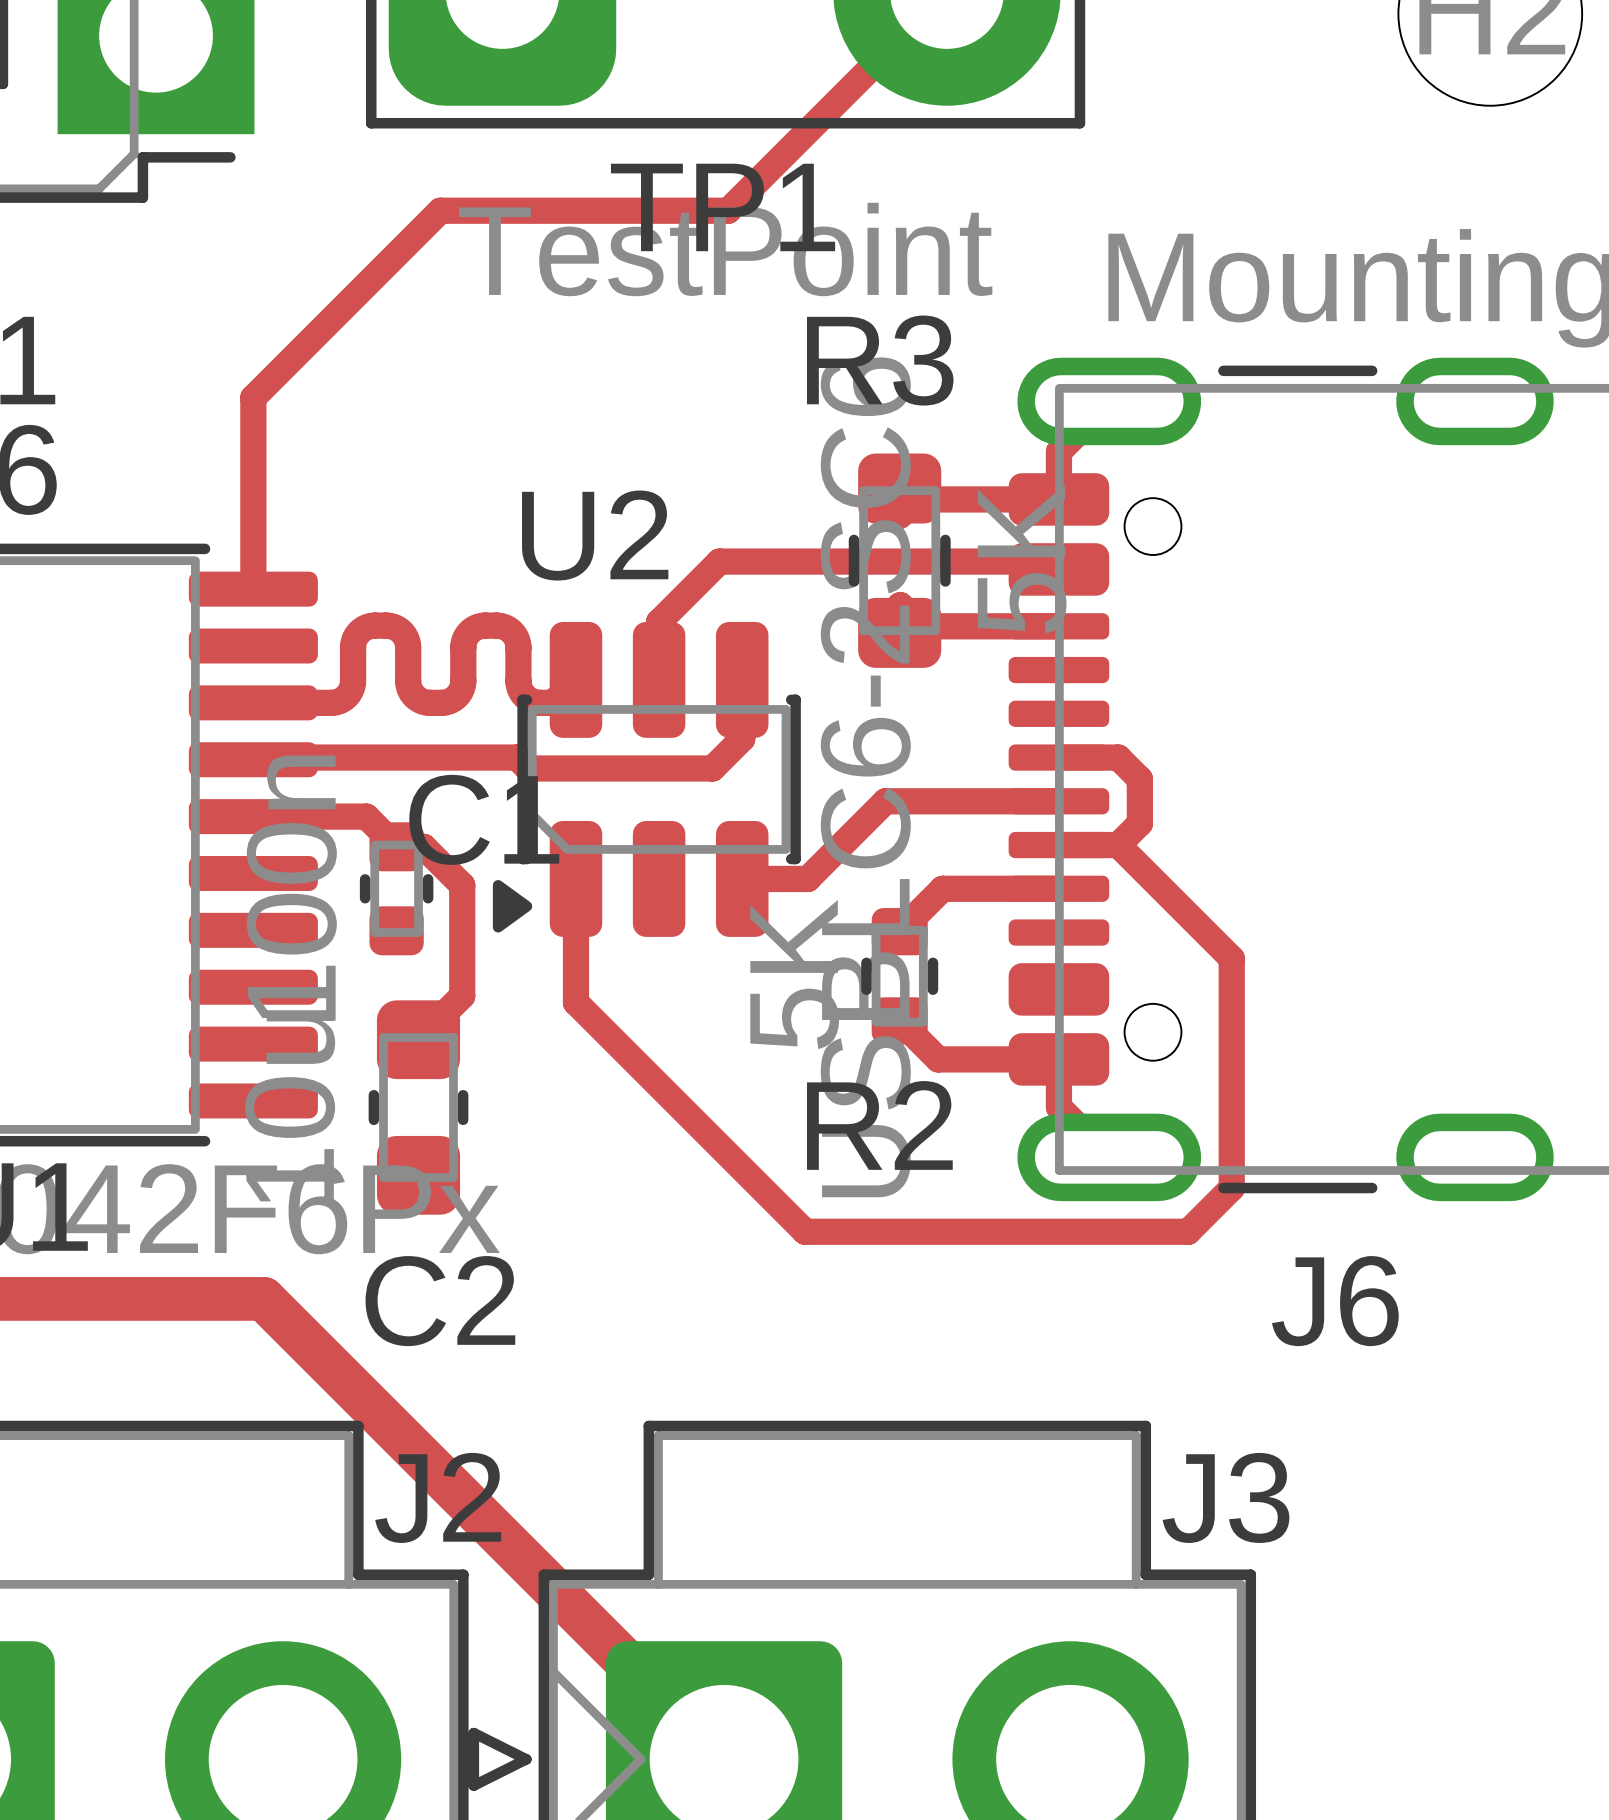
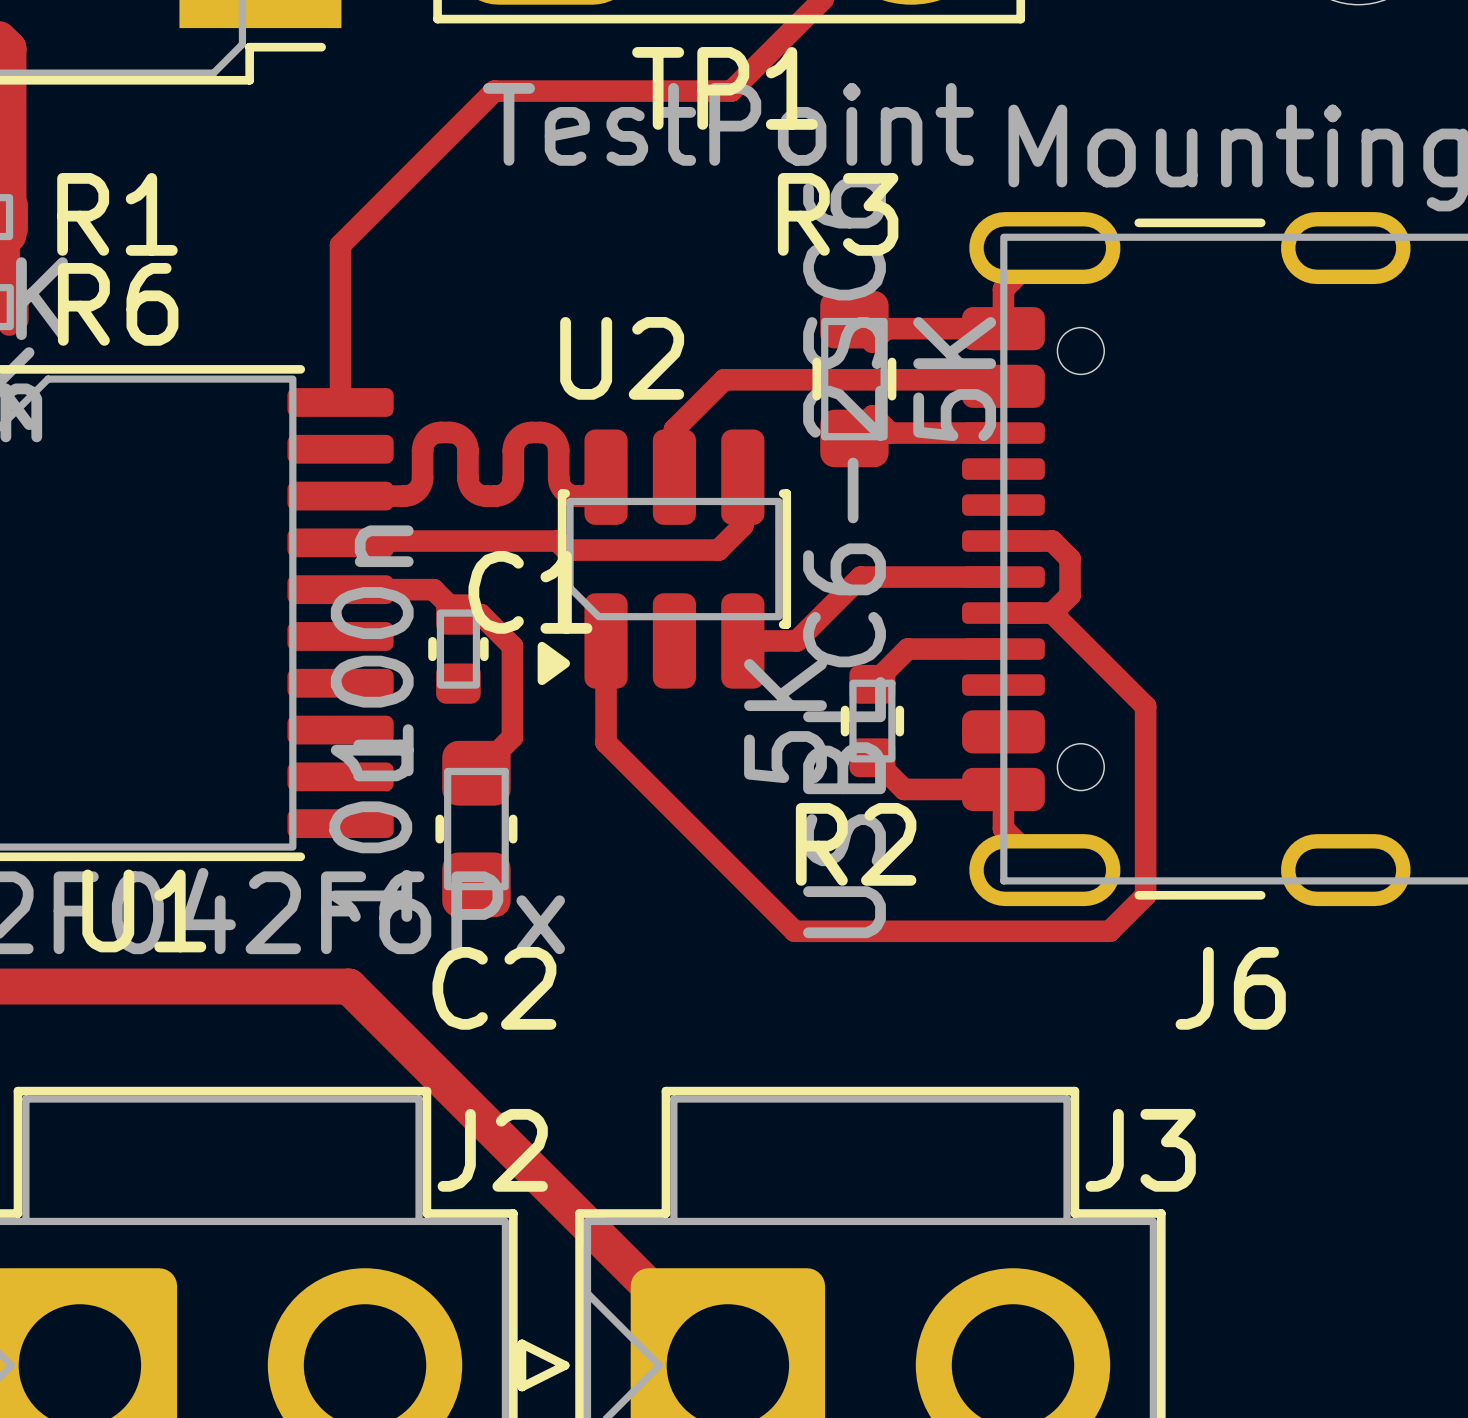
R3 position: (899, 560) -> (854, 379)

